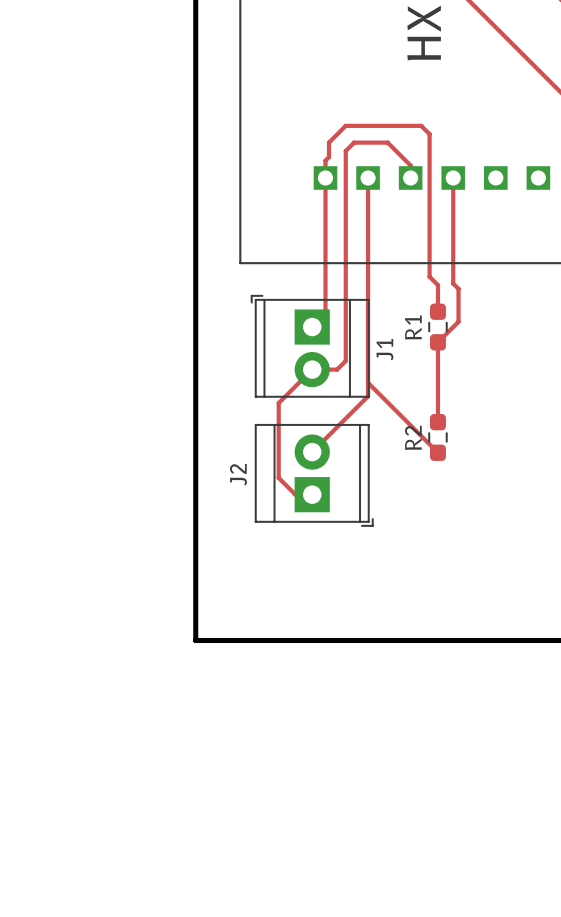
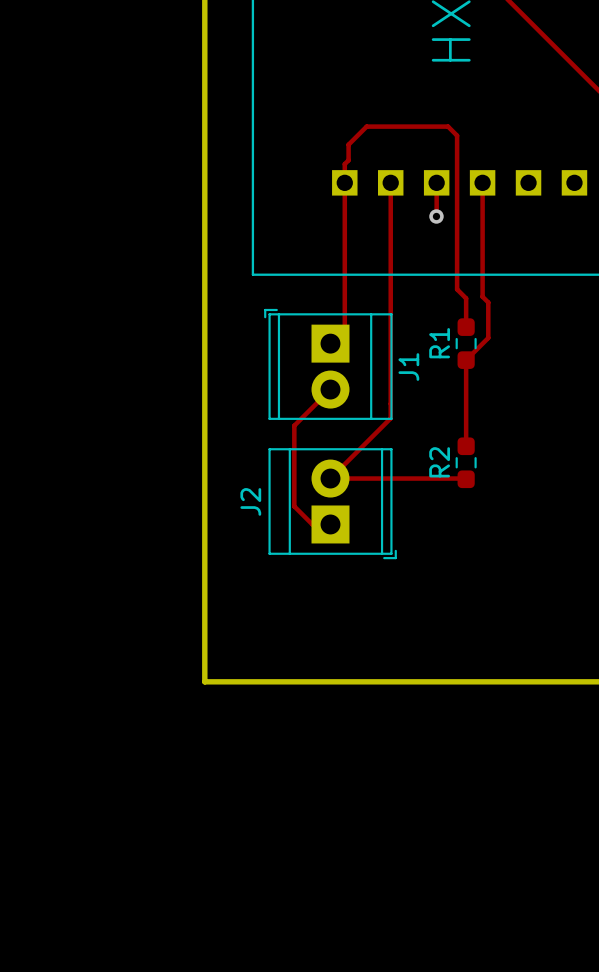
track: (410, 177) (410, 165) (387, 142) (354, 142) (345, 151) (345, 360) (337, 369) (312, 369) -> (436, 182) (436, 216)
via: none -> (436, 216)
track: (368, 382) (437, 452) -> (330, 478) (465, 478)

